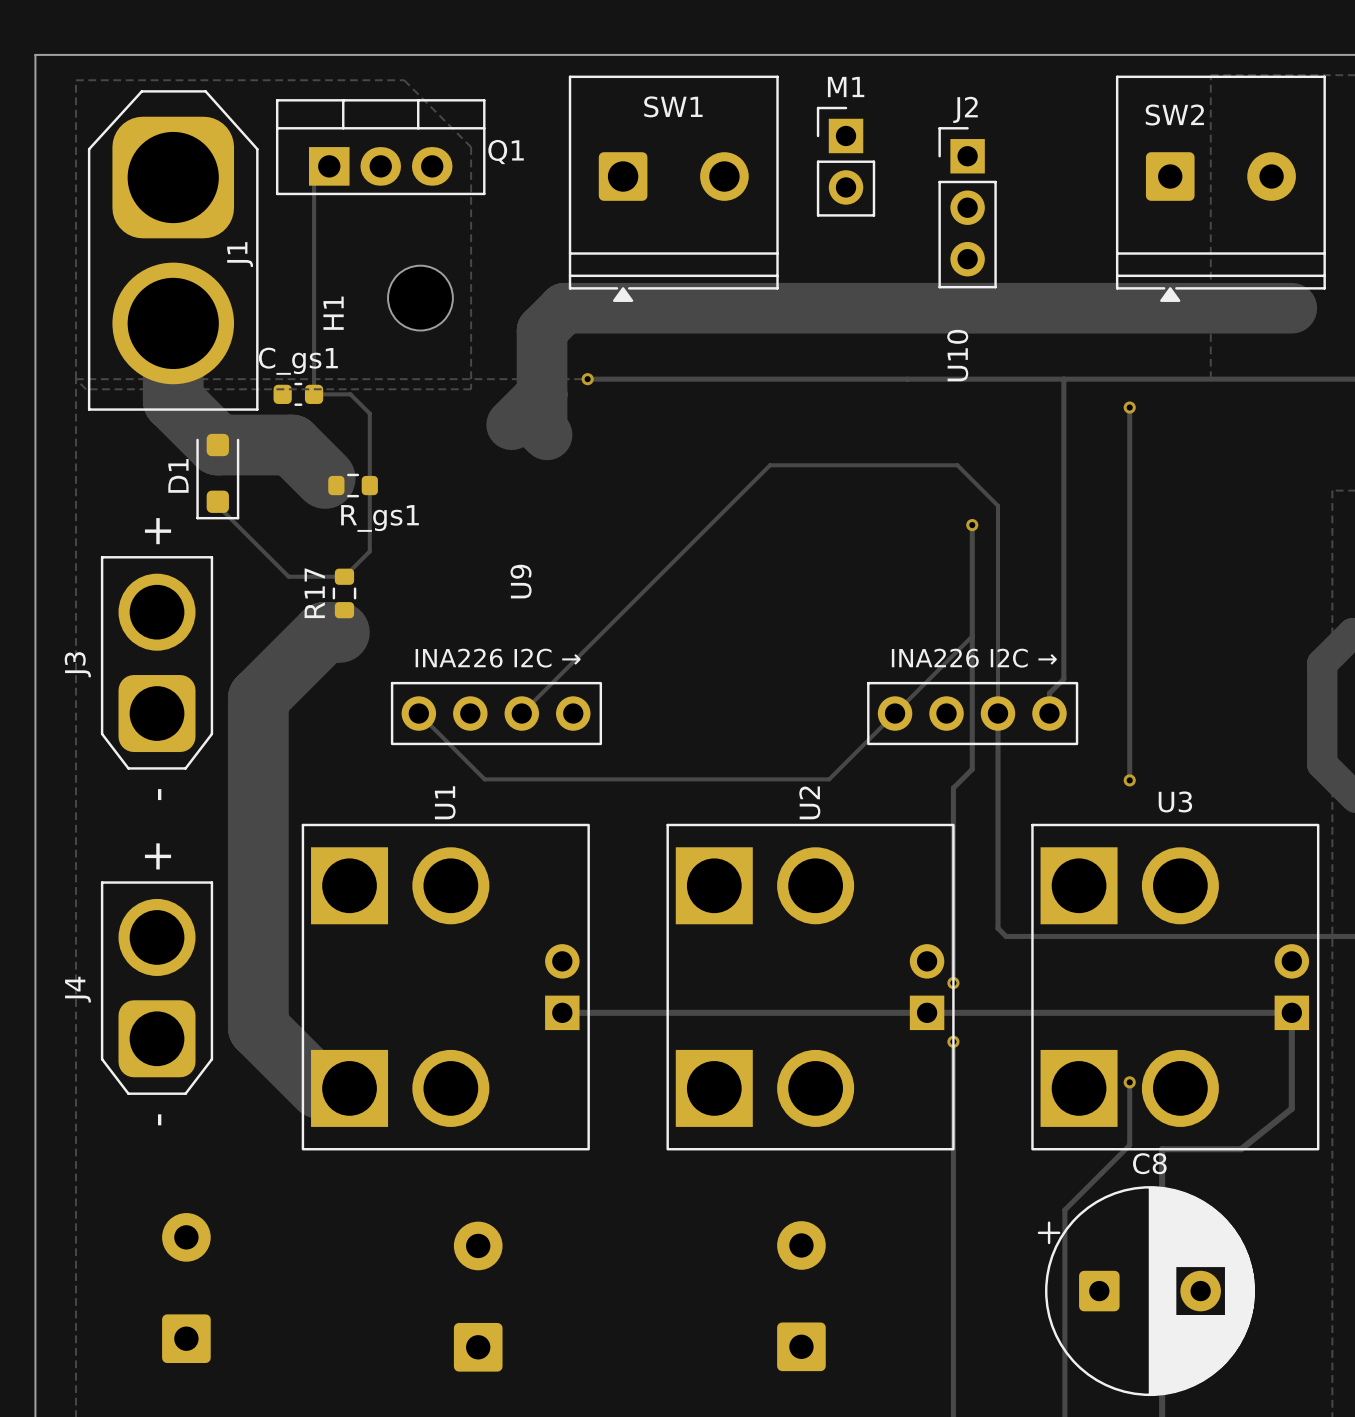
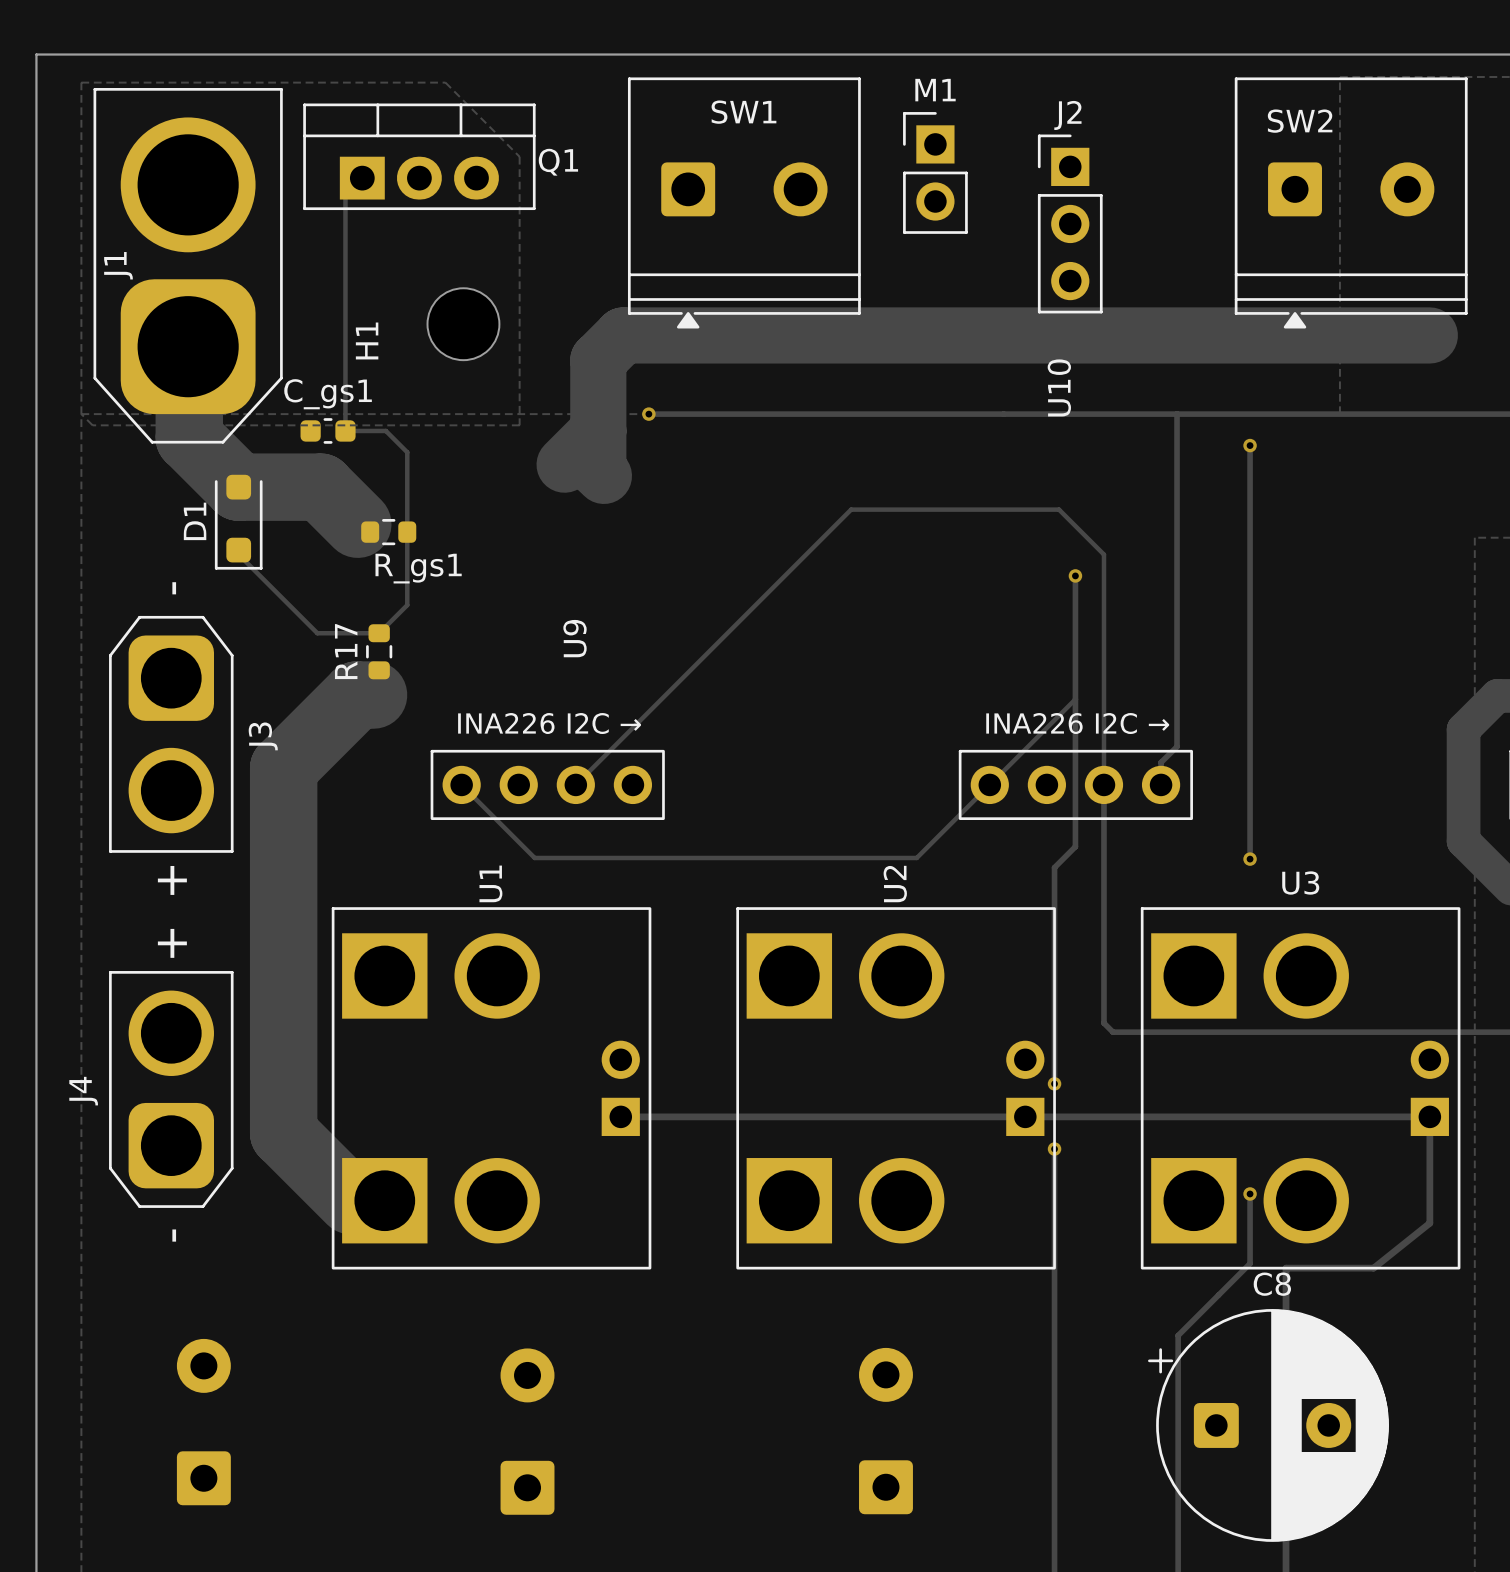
J1 rotation: 0° (173, 250) -> 180° (188, 265)
J3 rotation: 0° (157, 662) -> 180° (171, 734)

